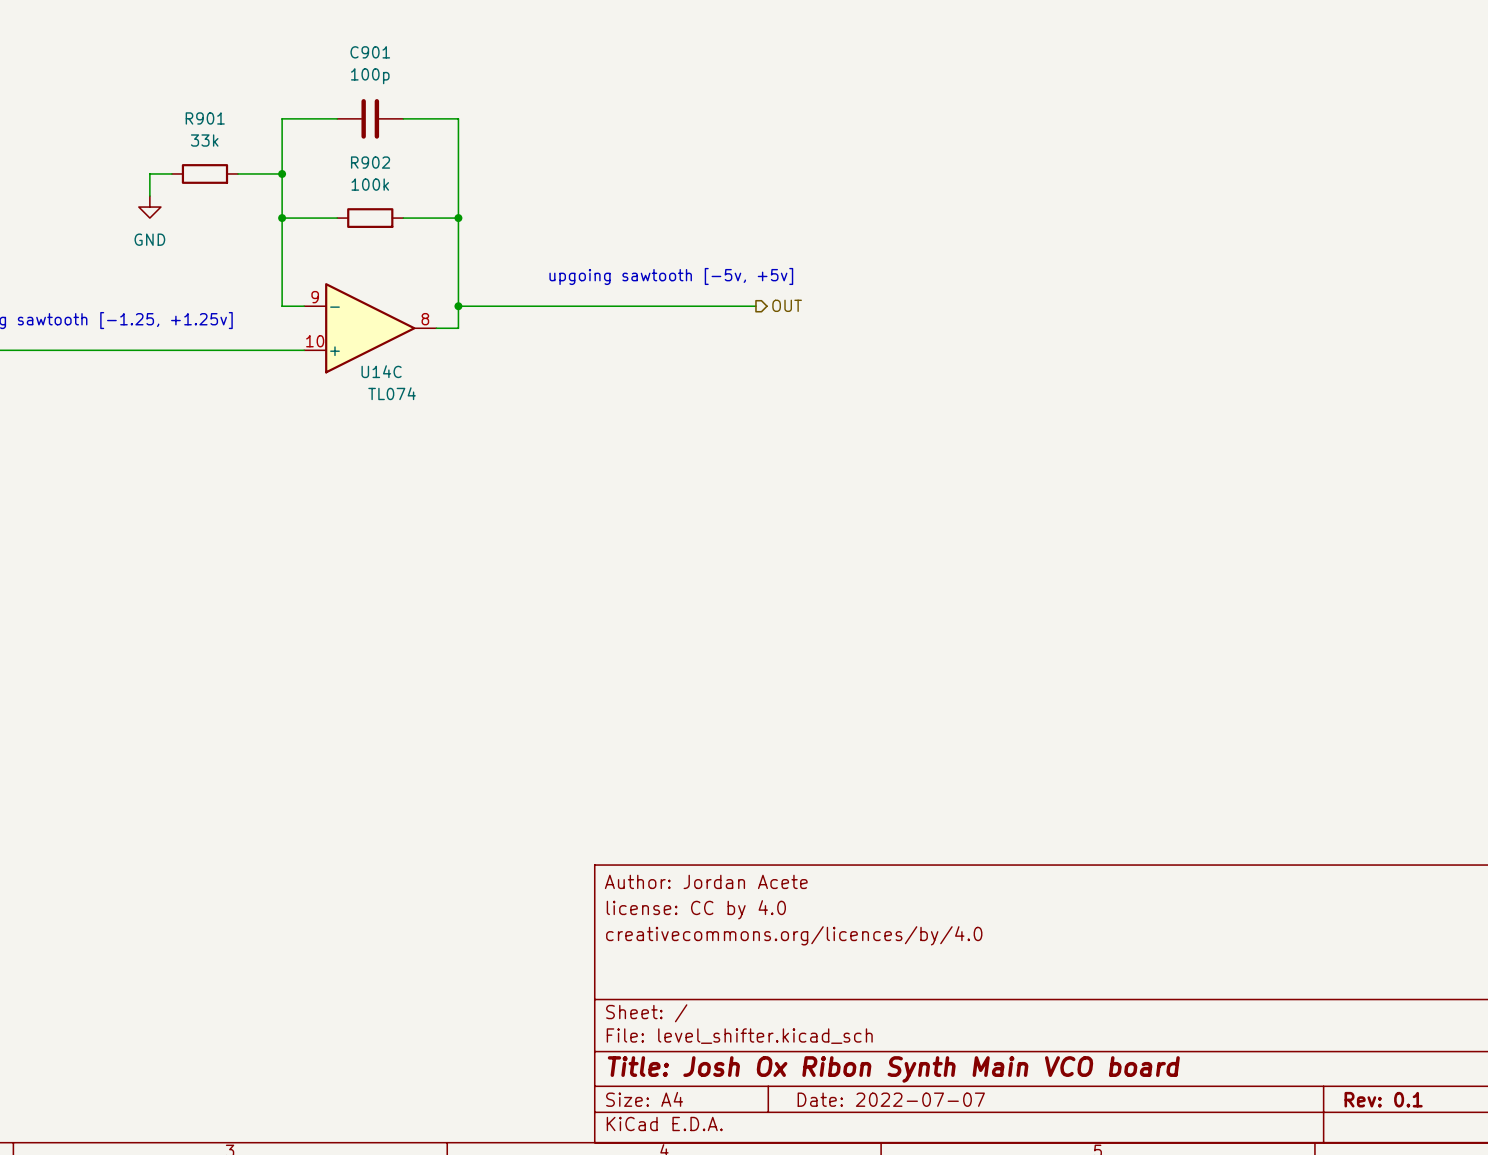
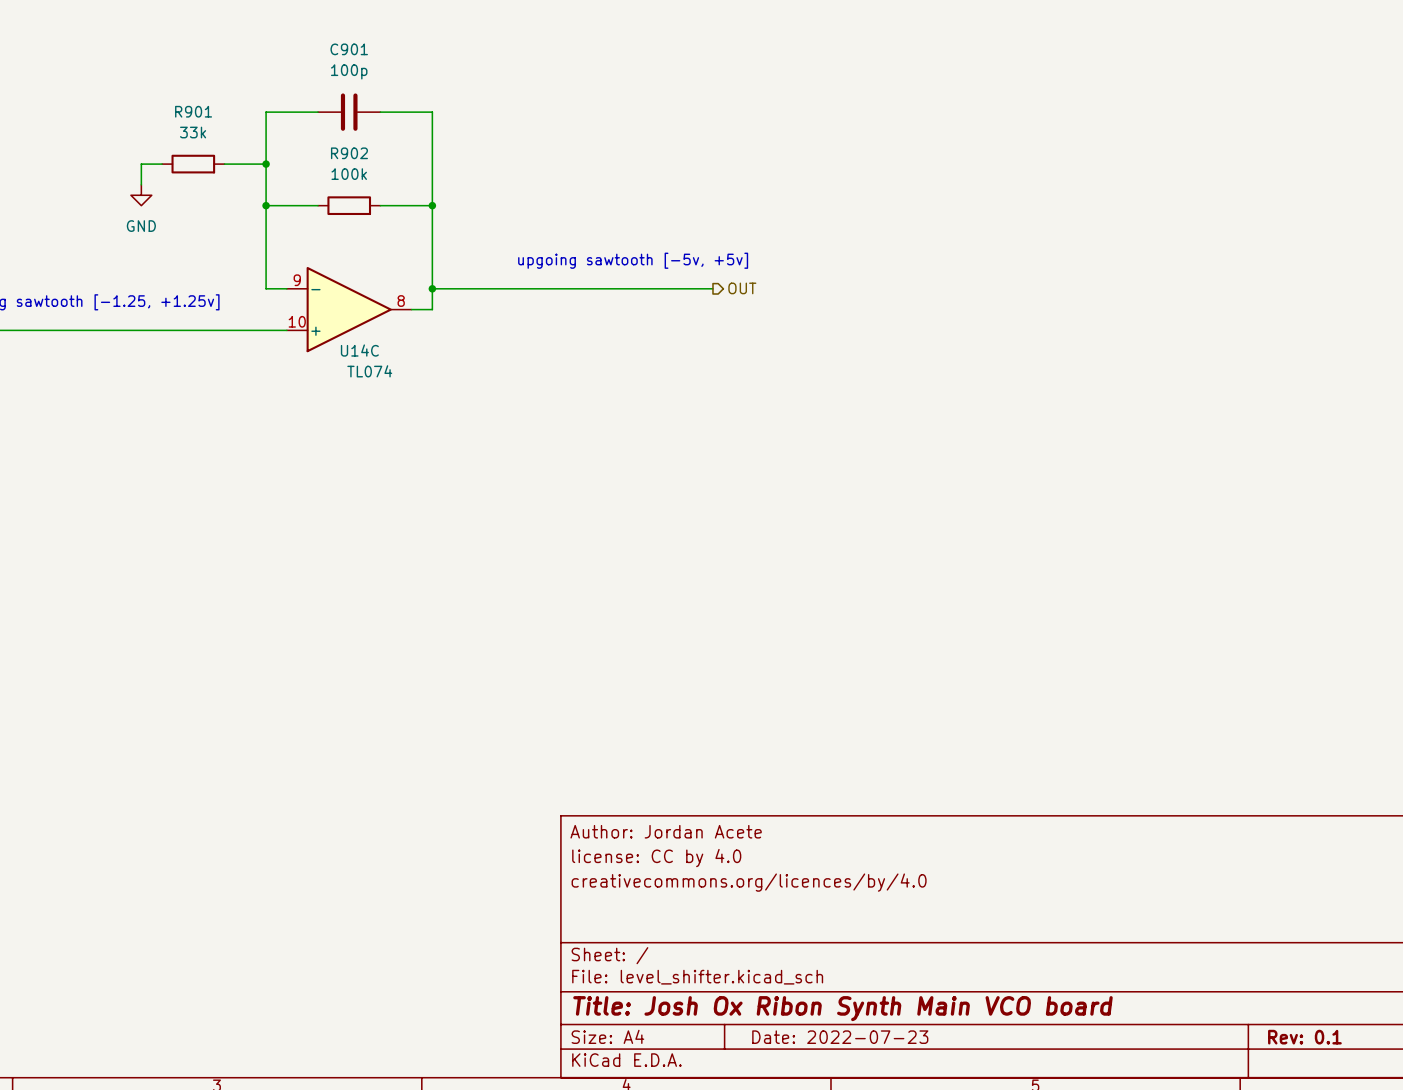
title block: Date: 2022-07-07 (891, 1099) -> Date: 2022-07-23 (840, 1037)

